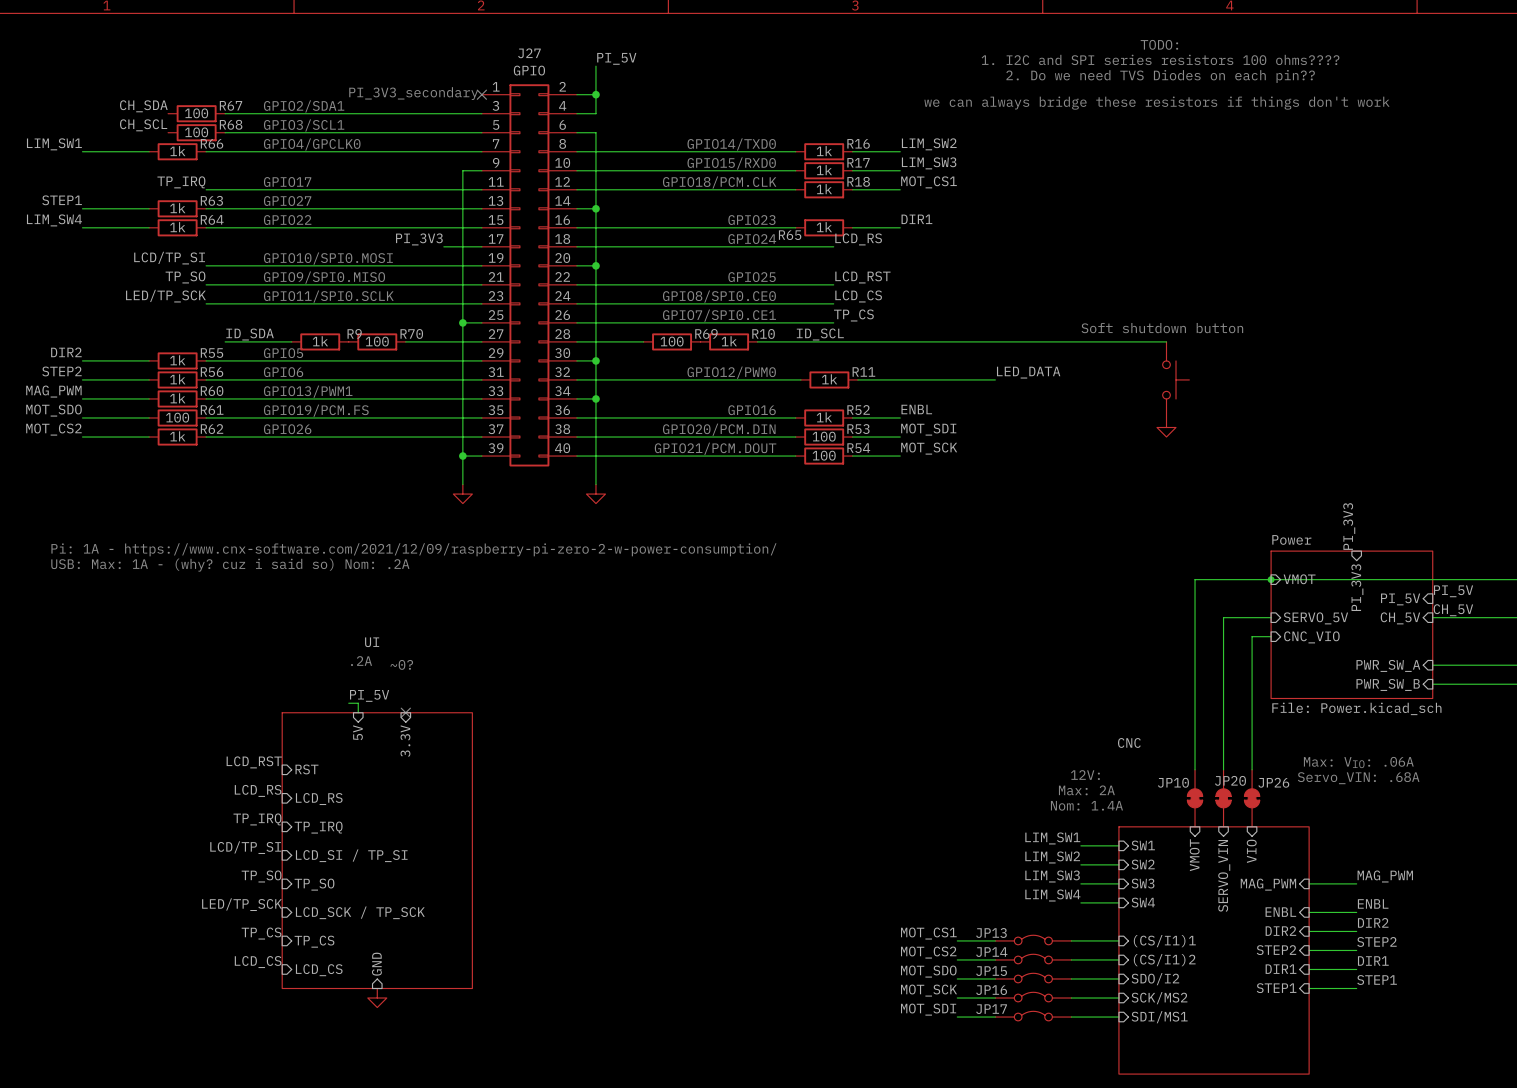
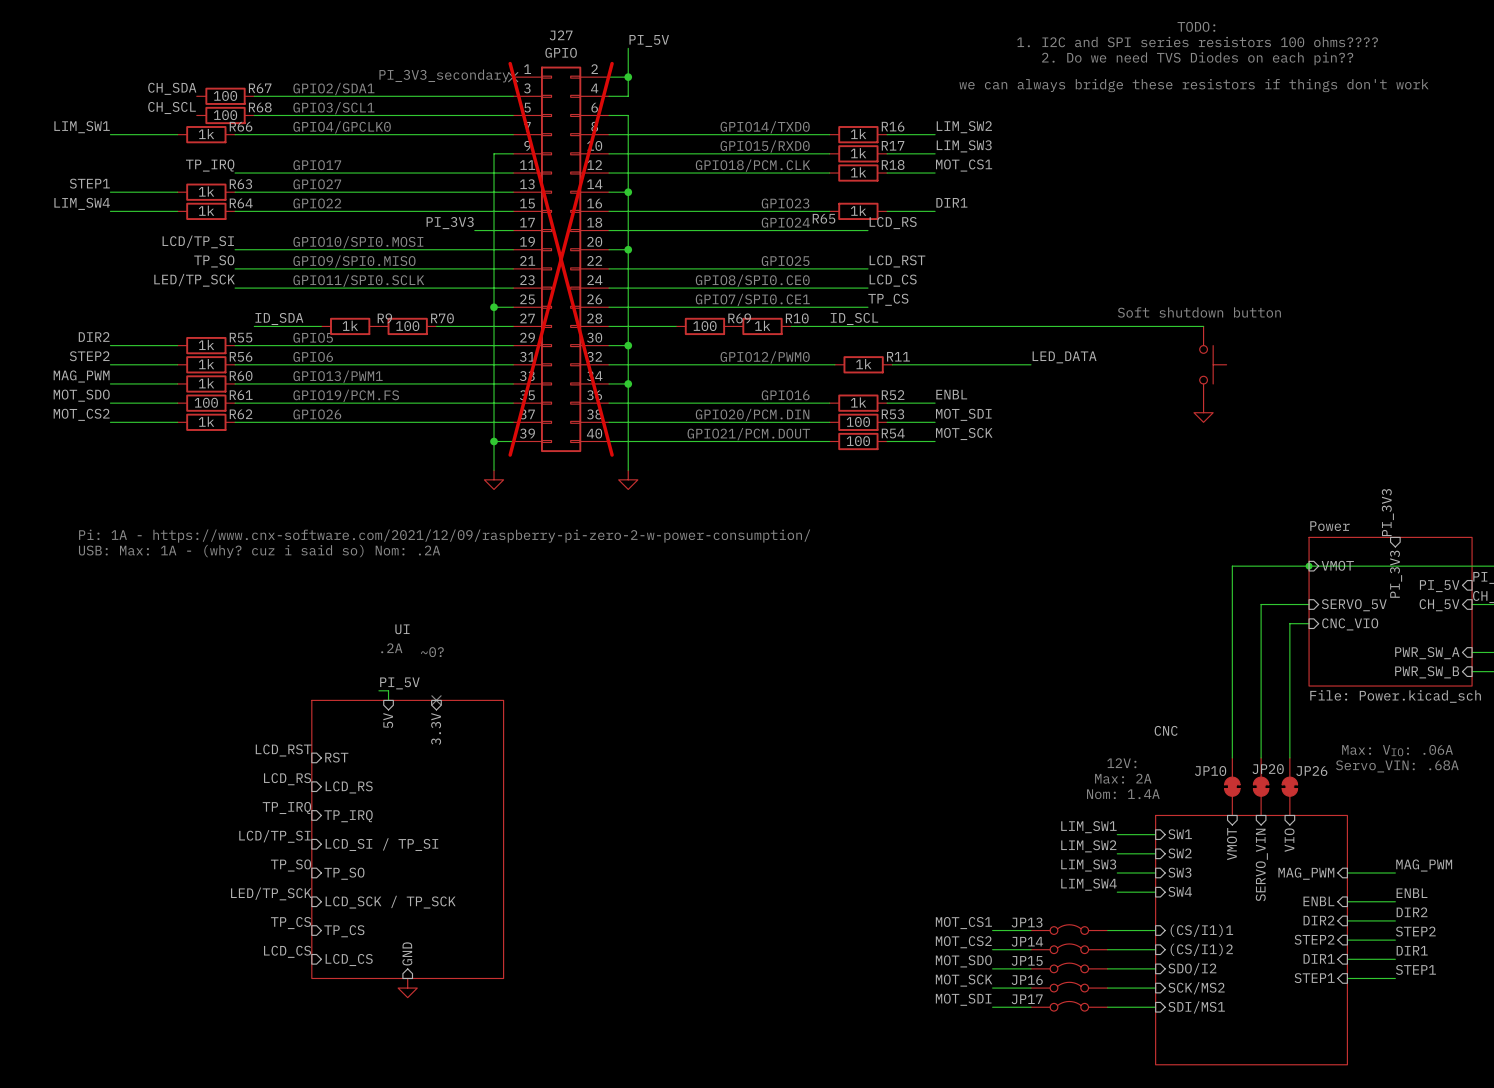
J27 do-not-place cross: none -> (561, 259)

